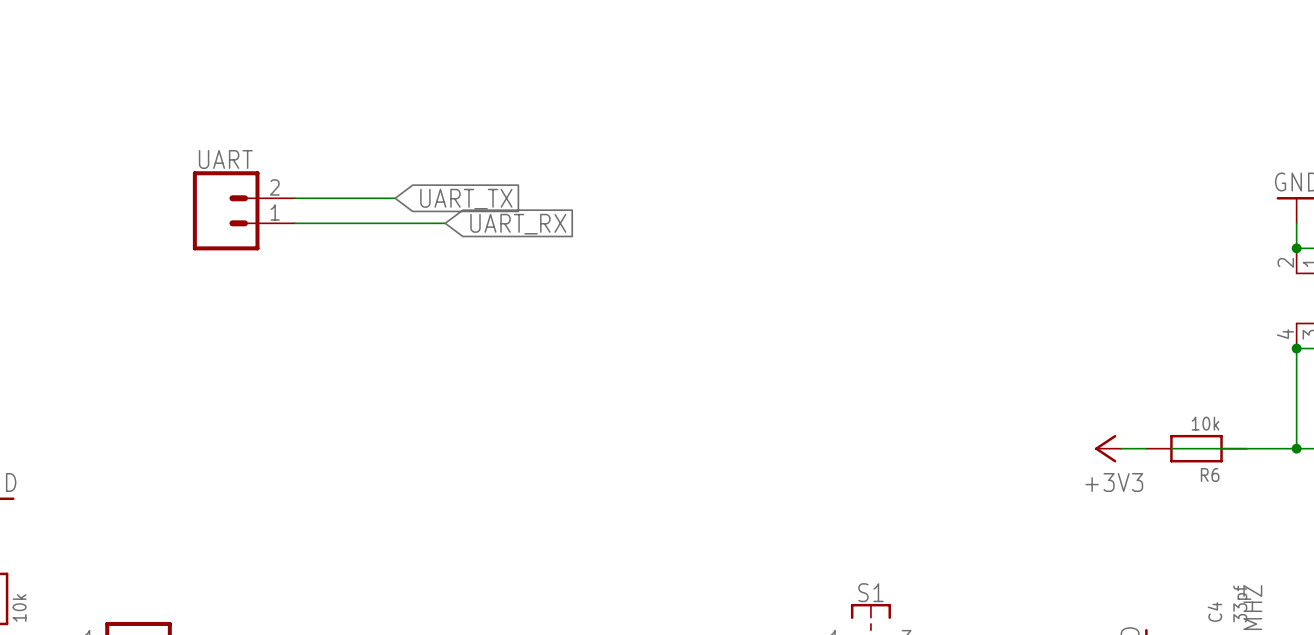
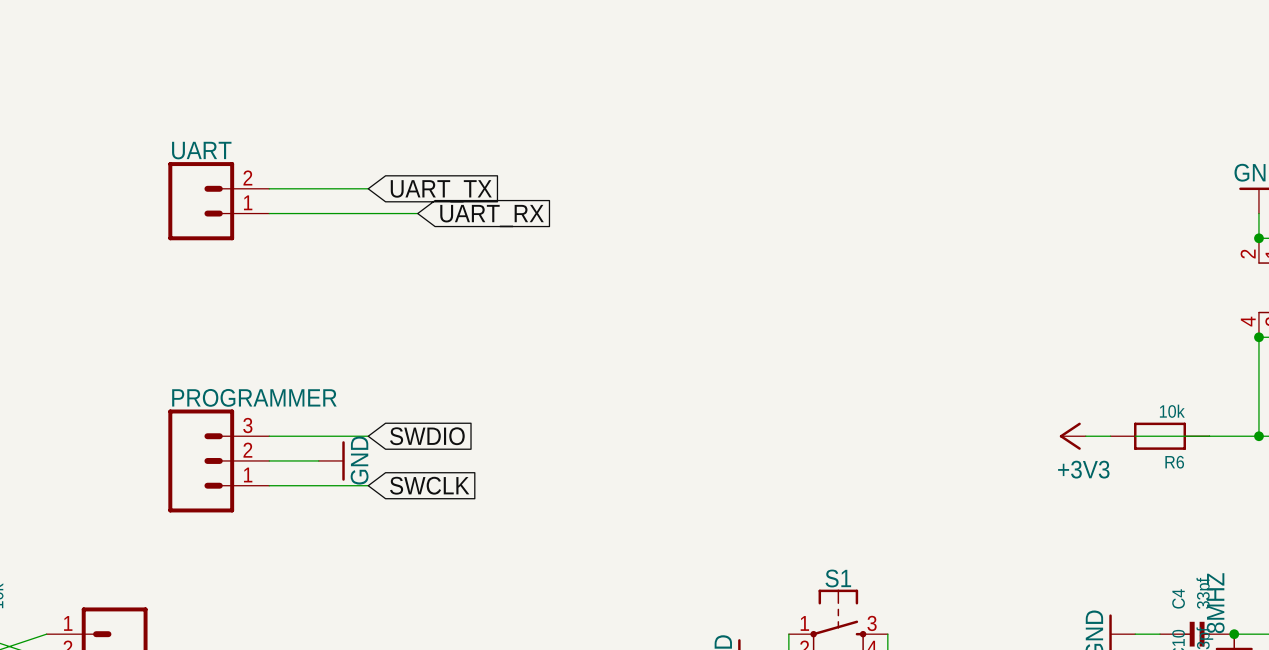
wire: none -> (269, 436) (368, 436)
global label: none -> SWDIO (427, 436)
PROGRAMMER: none -> (218, 460)
wire: none -> (269, 460) (318, 460)
power symbol: none -> GND (331, 460)
wire: none -> (269, 485) (368, 485)
global label: none -> SWCLK (429, 485)

